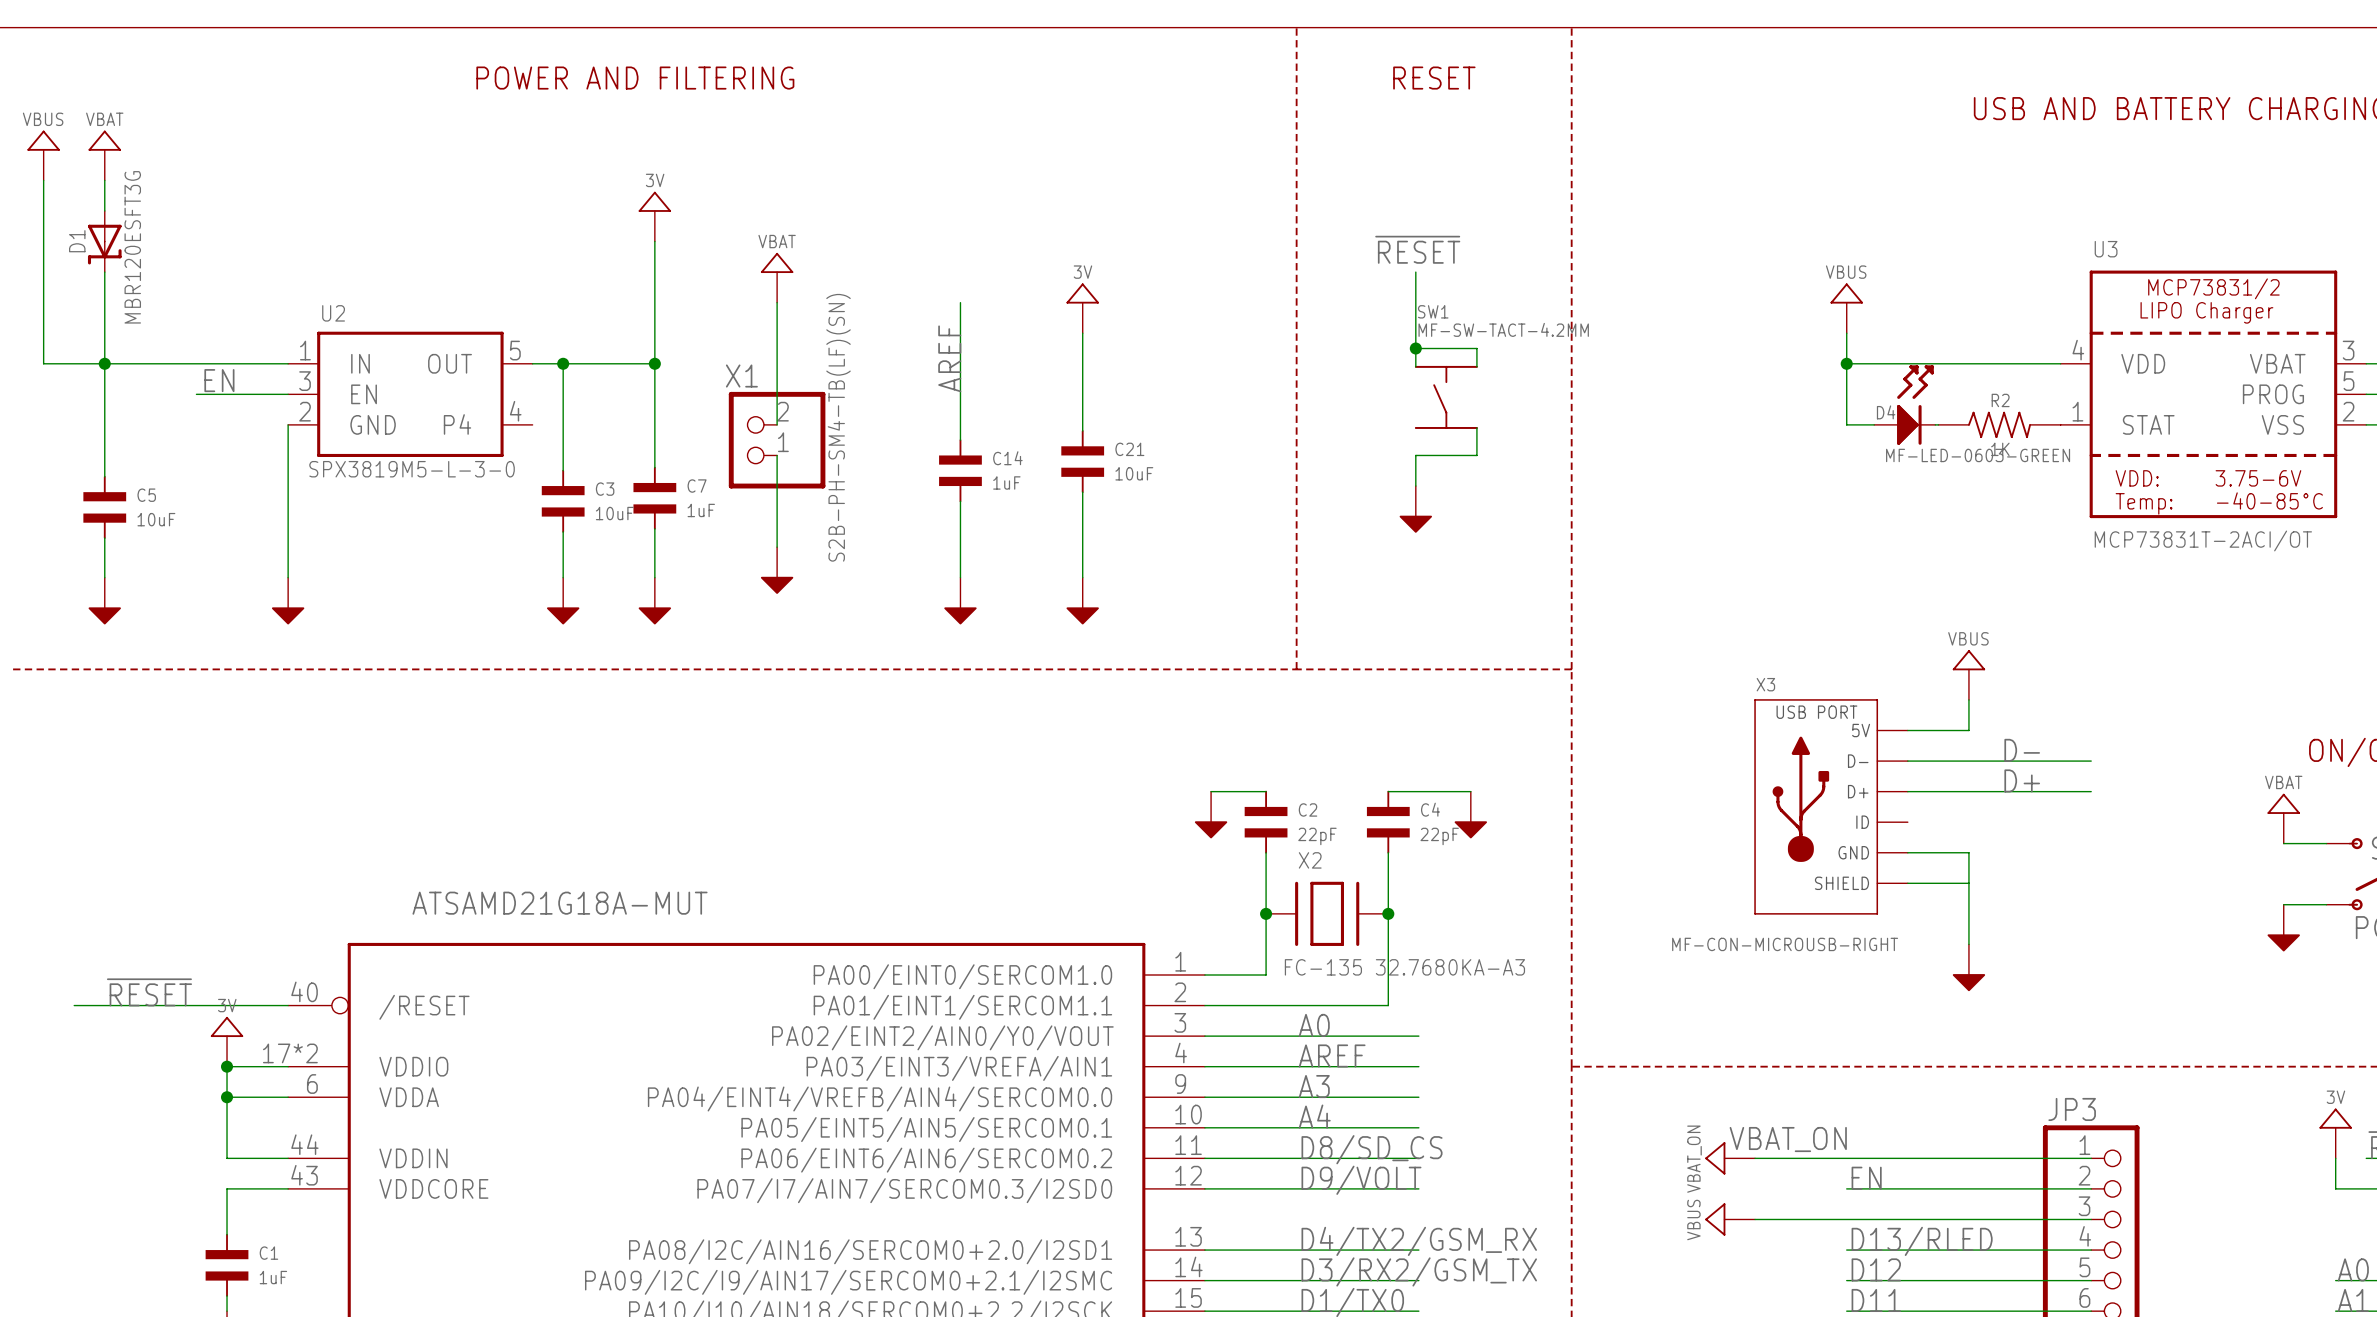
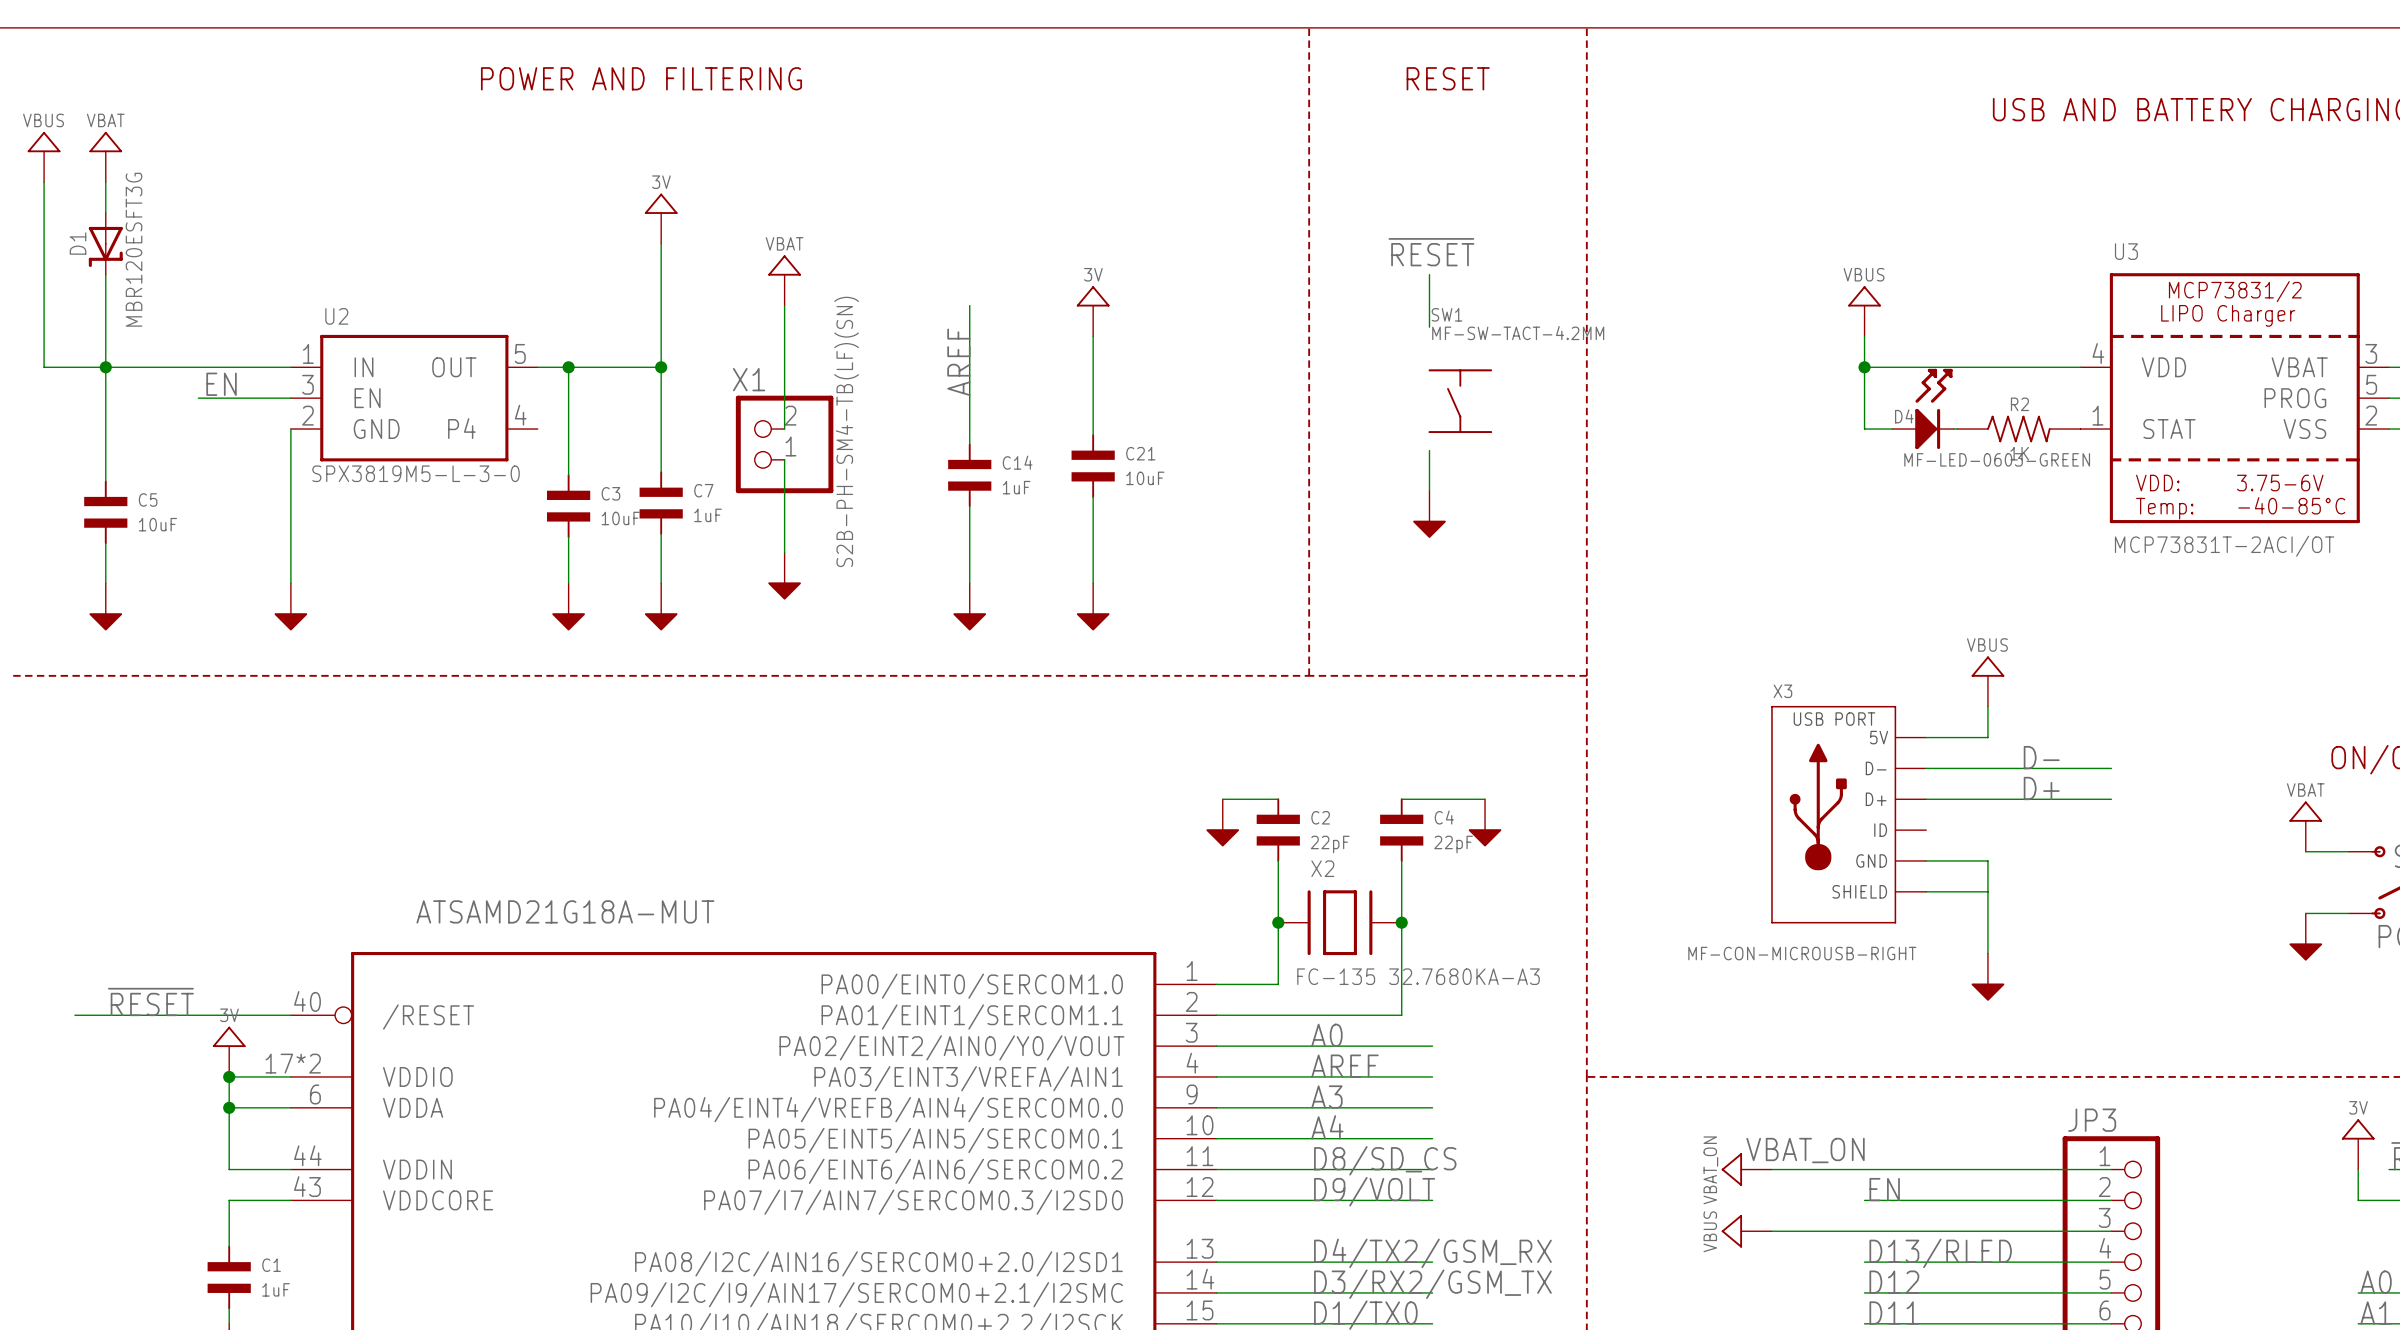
wire: (1415, 324) (1415, 366) -> none
wire: (1415, 348) (1476, 348) (1476, 366) -> none
junction: (1415, 348) -> none
wire: (1476, 427) (1476, 455) (1415, 455) -> (1429, 450) (1429, 459)

